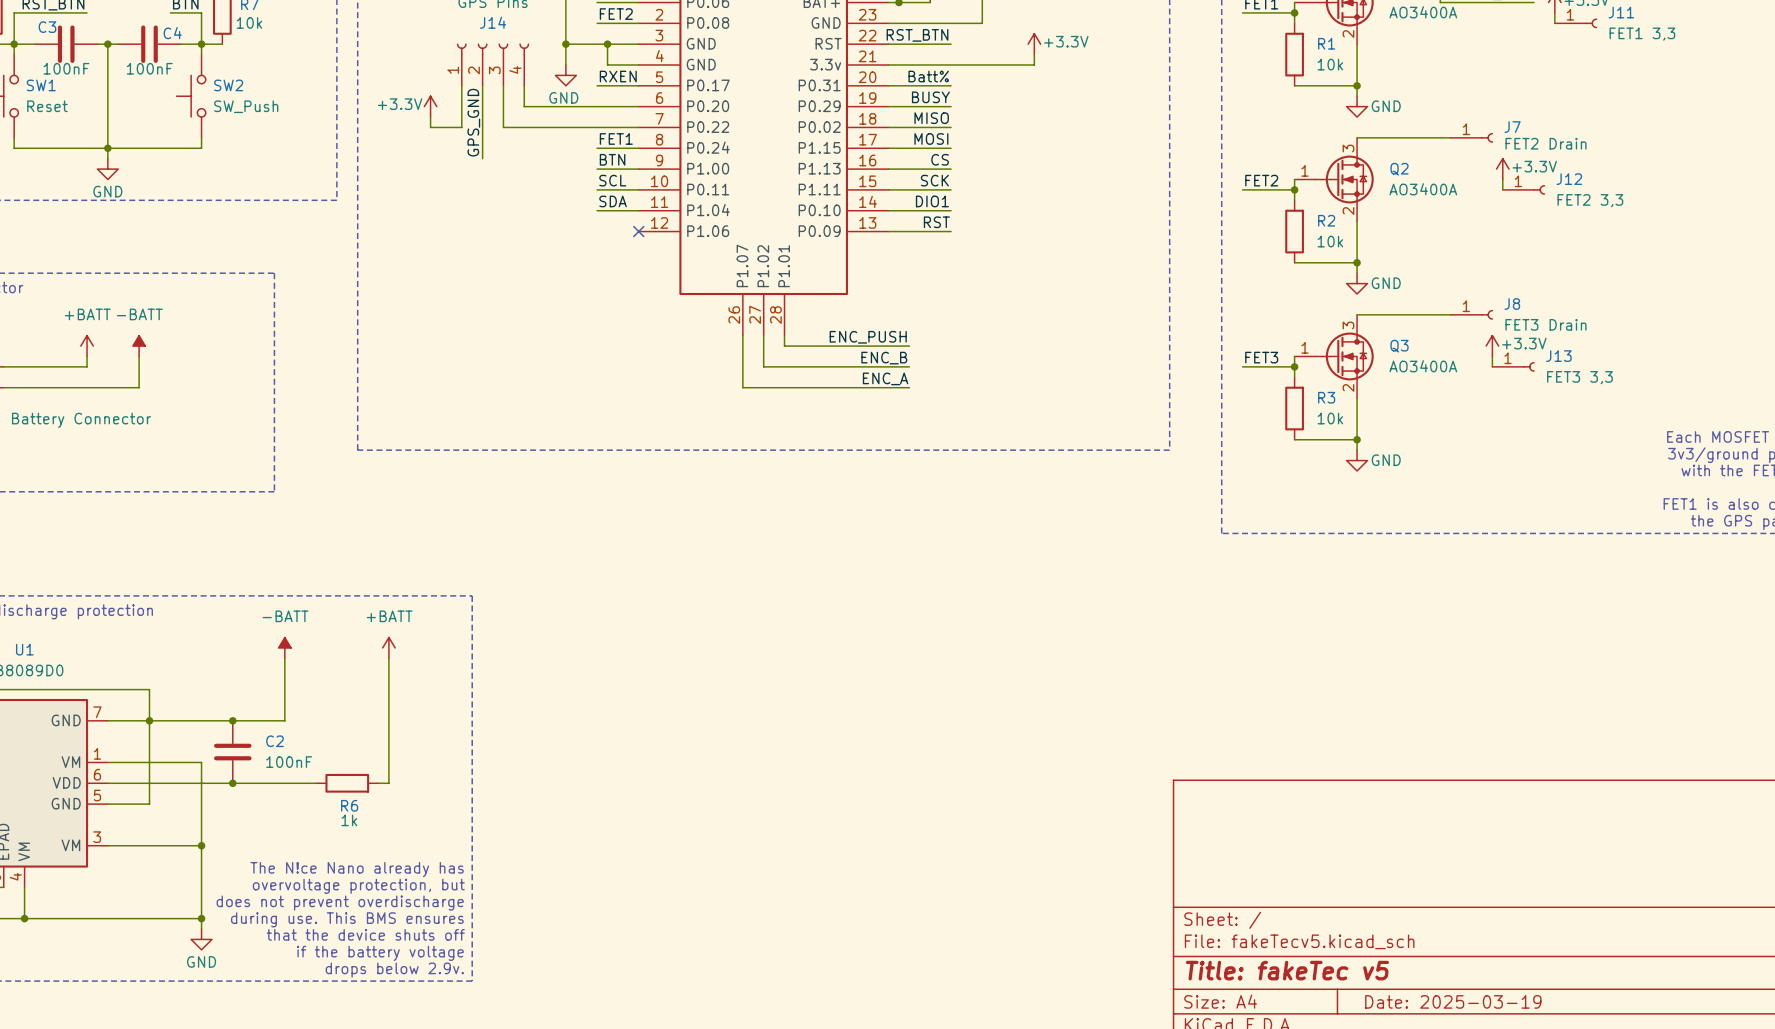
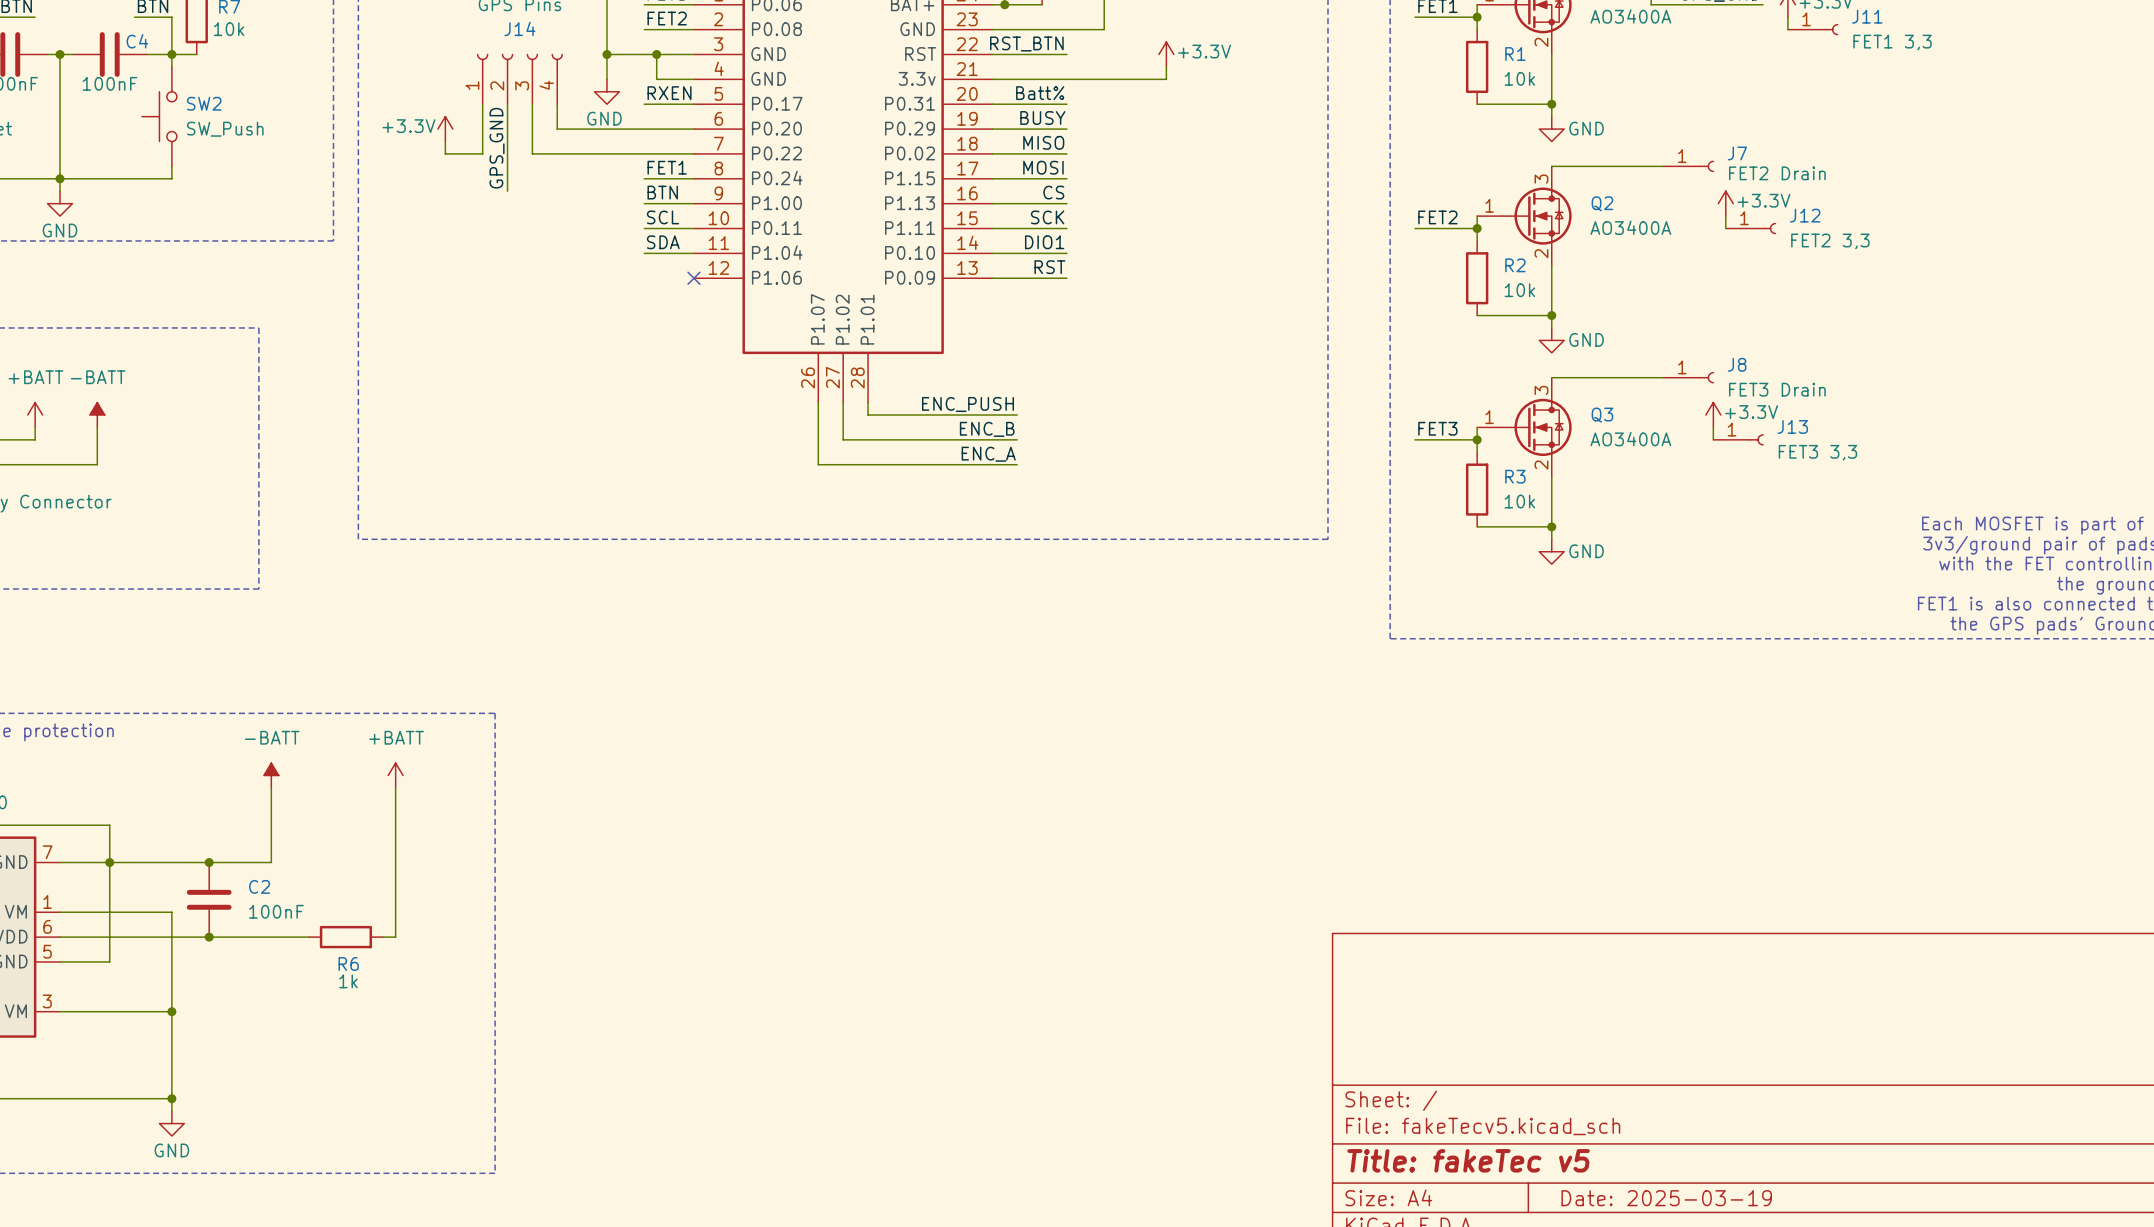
text: The N!ce Nano already has (357, 869) -> none
text: overvoltage protection, but (358, 886) -> none
text: does not prevent overdischarge (340, 903) -> none
text: during use. This BMS ensures (347, 919) -> none
text: that the device shuts off (365, 934) -> none
text: if the battery voltage (380, 953) -> none
text: drops below 2.9v. (394, 970) -> none

